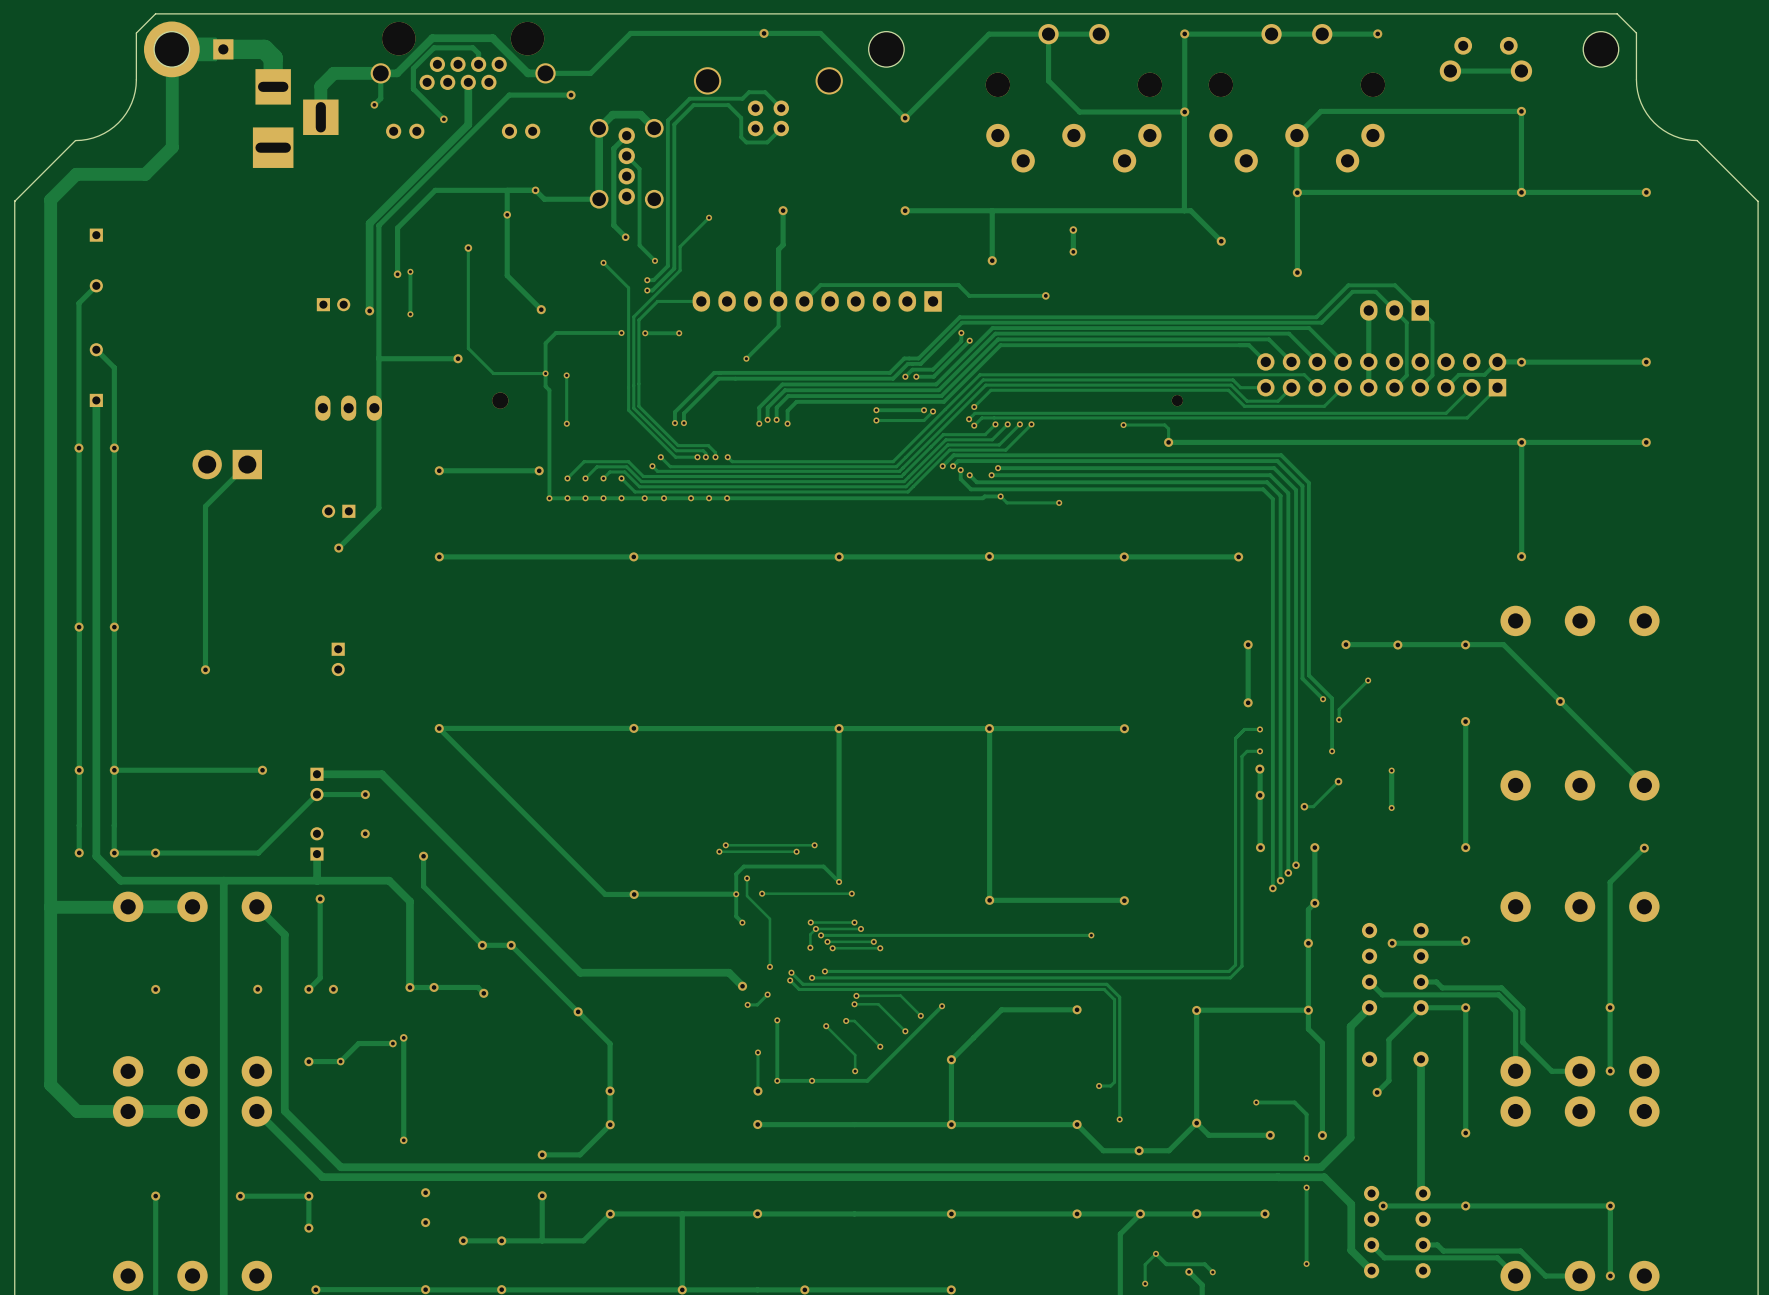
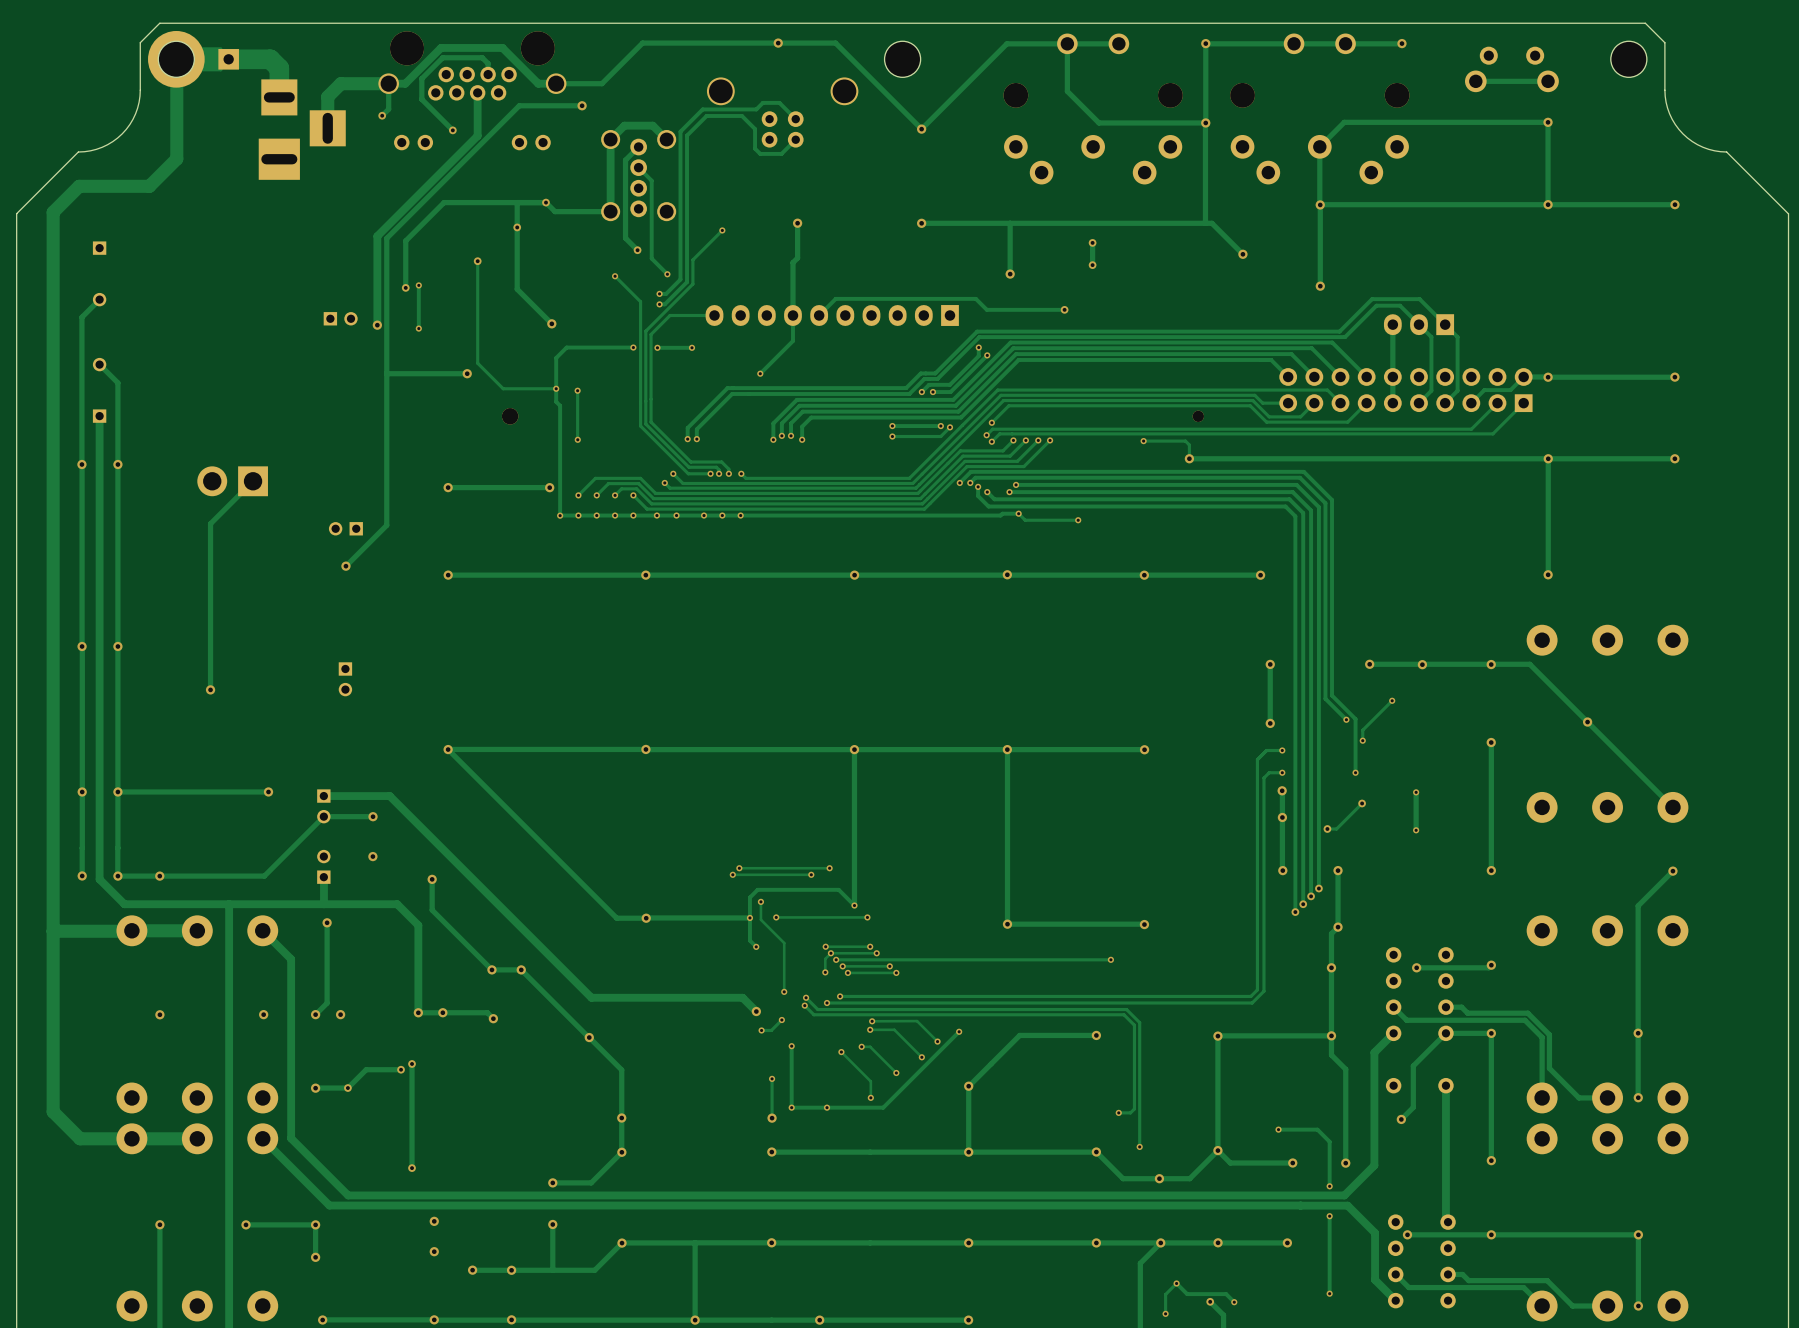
part: (348, 408) -> none

